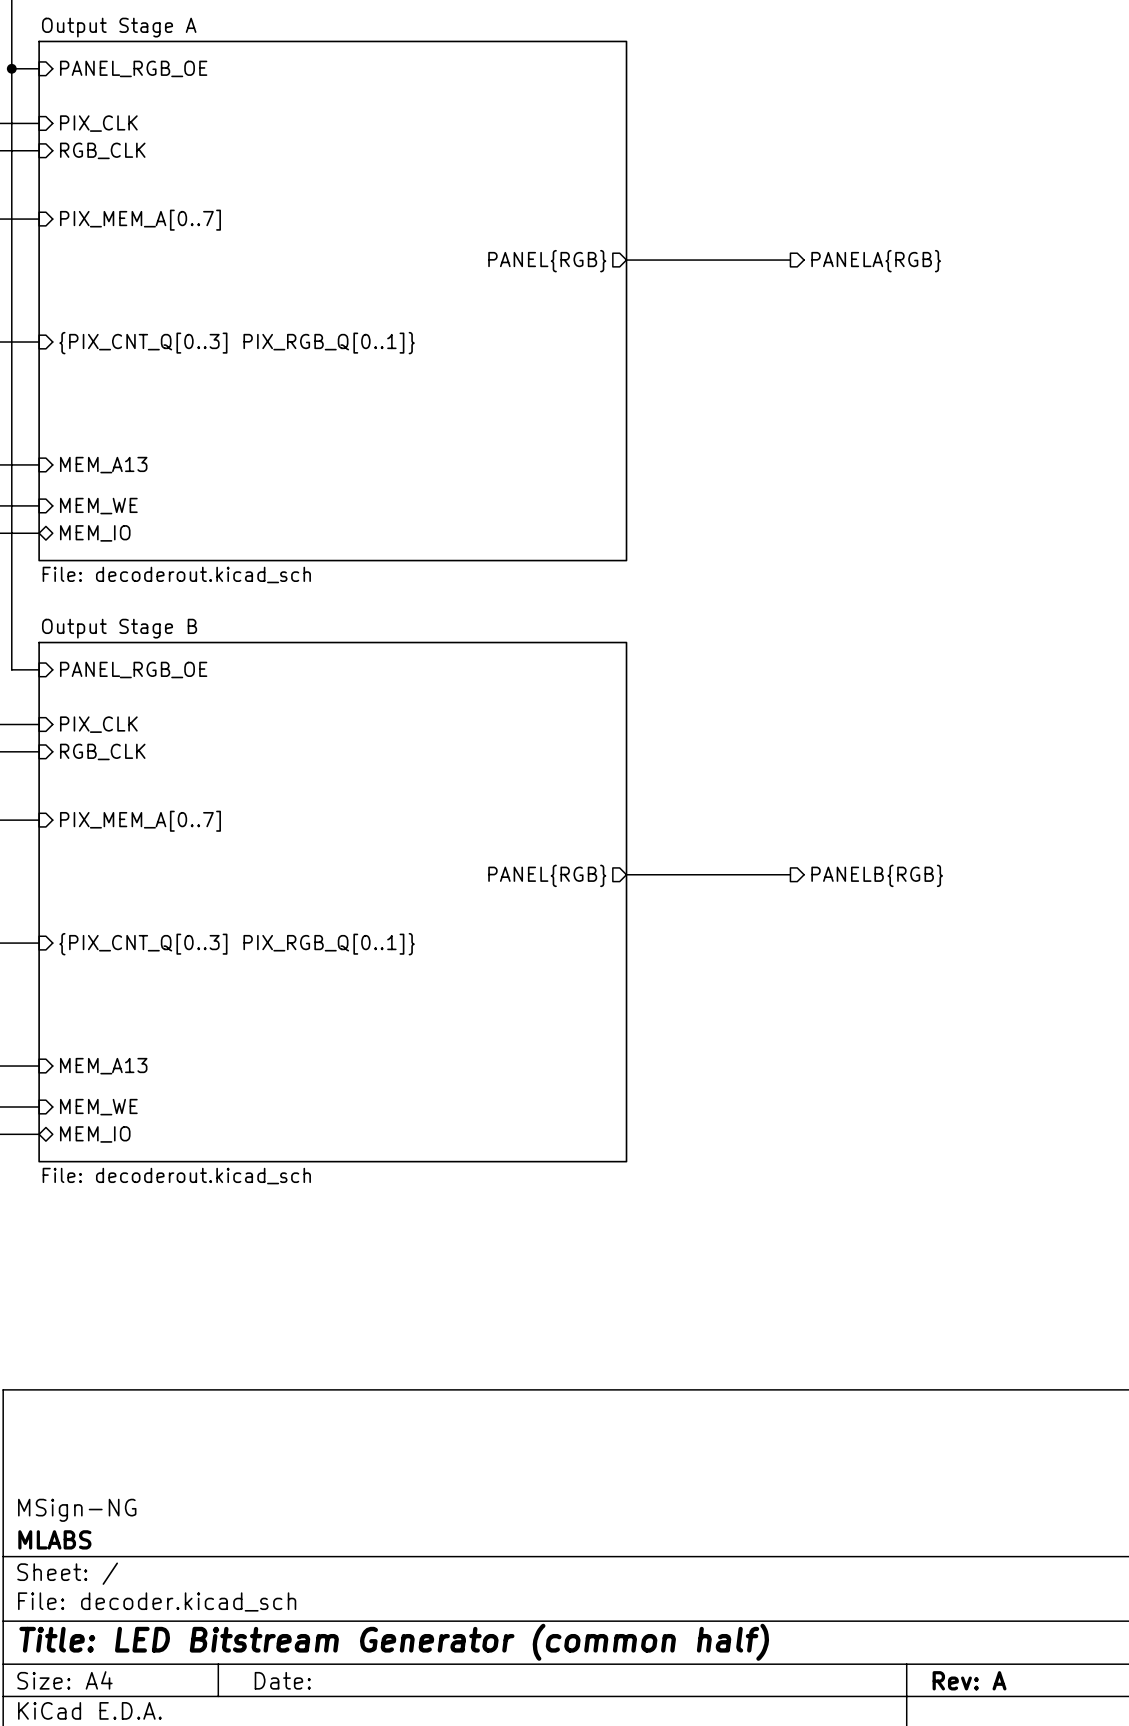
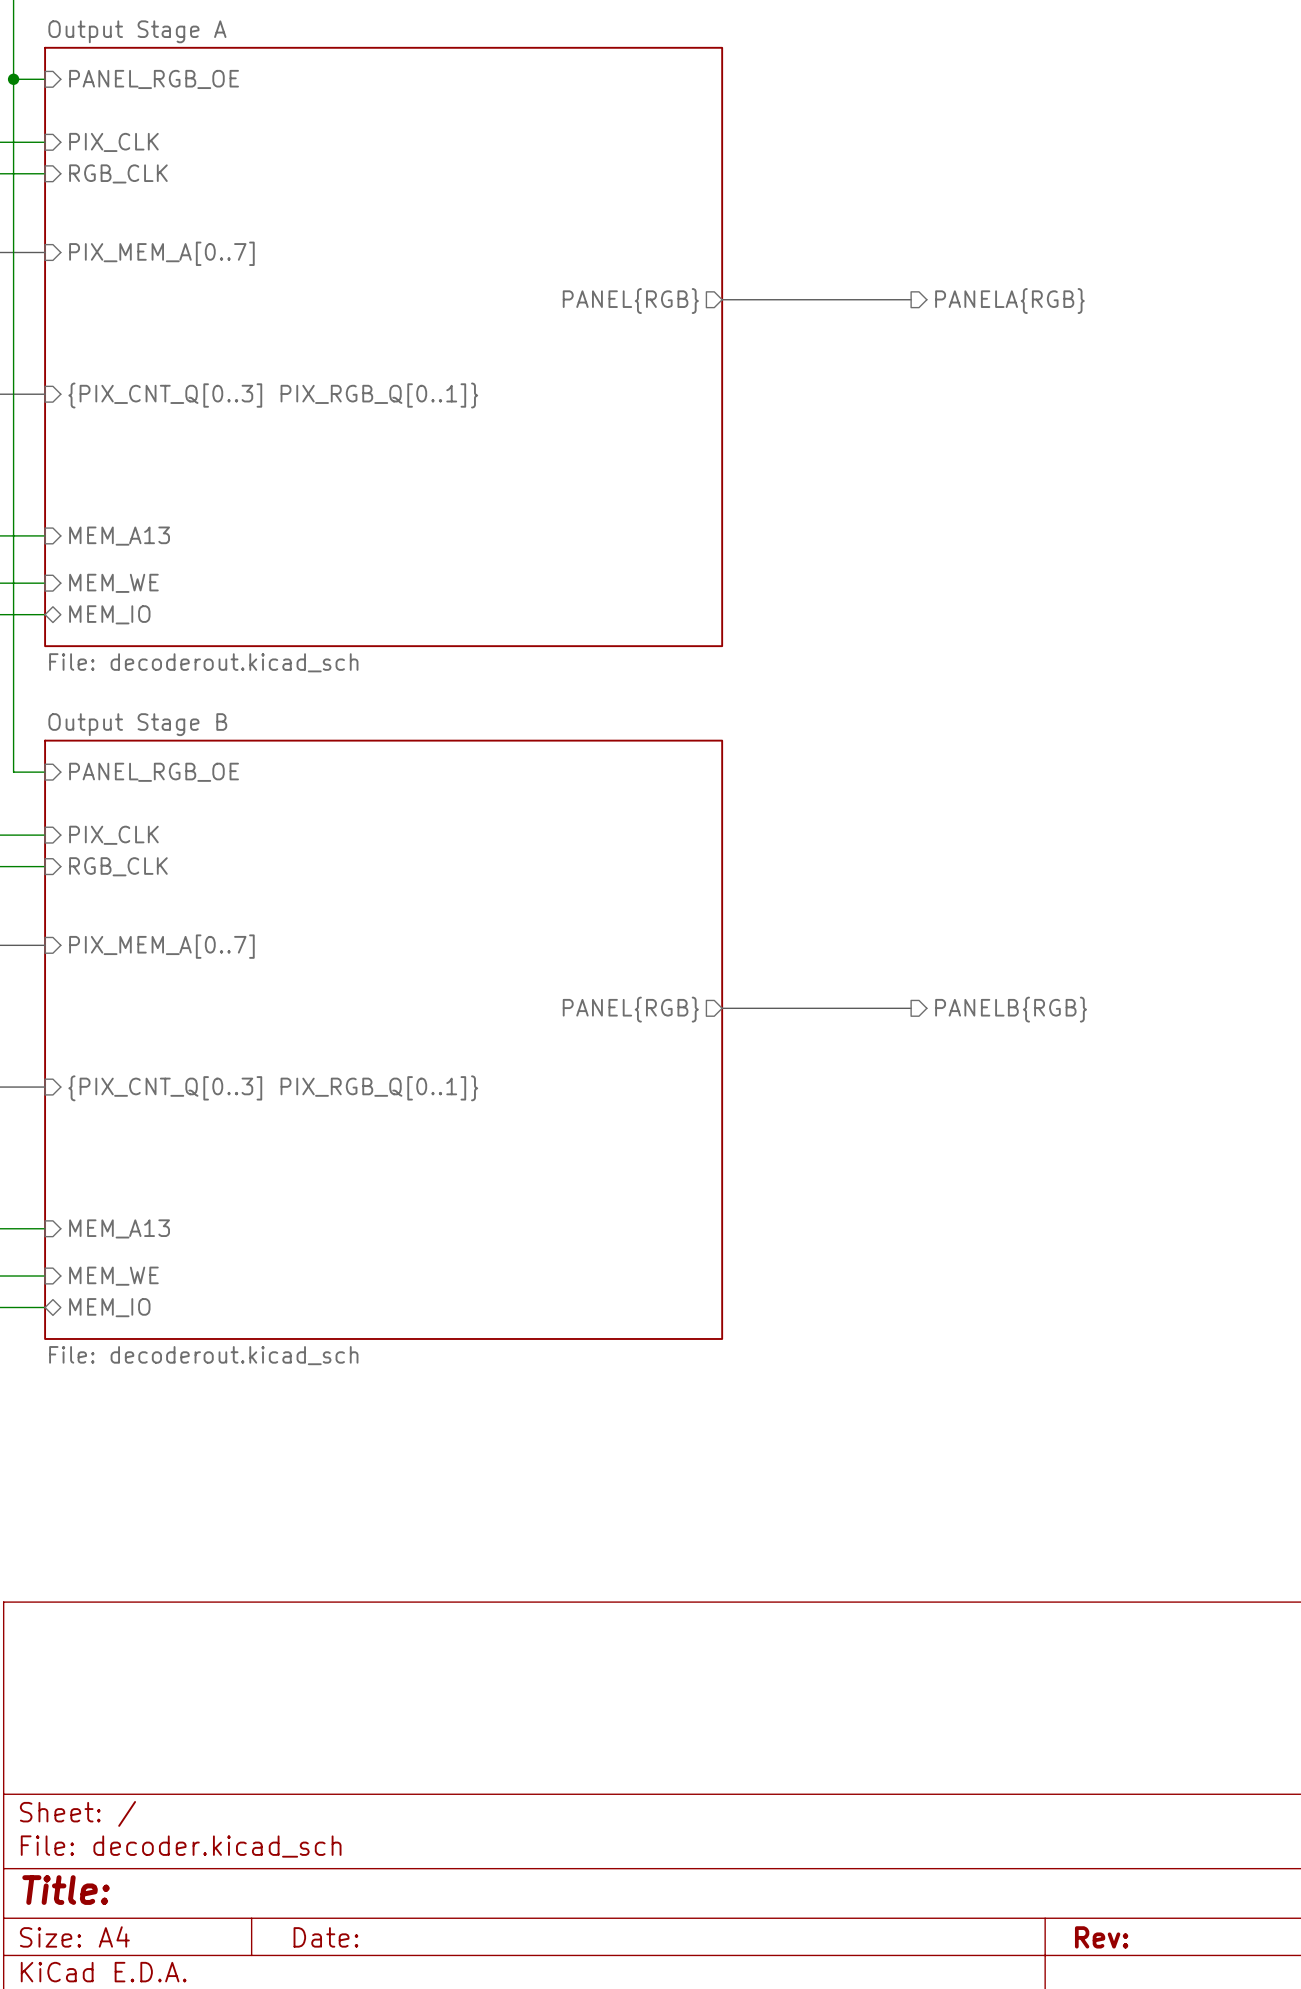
title block: MSign-NG (77, 1510) -> none
title block: MLABS (54, 1539) -> none
title block: Title: LED Bitstream Generator (common half) (394, 1642) -> Title: (66, 1890)
title block: Rev: A (969, 1680) -> Rev: (1101, 1937)

